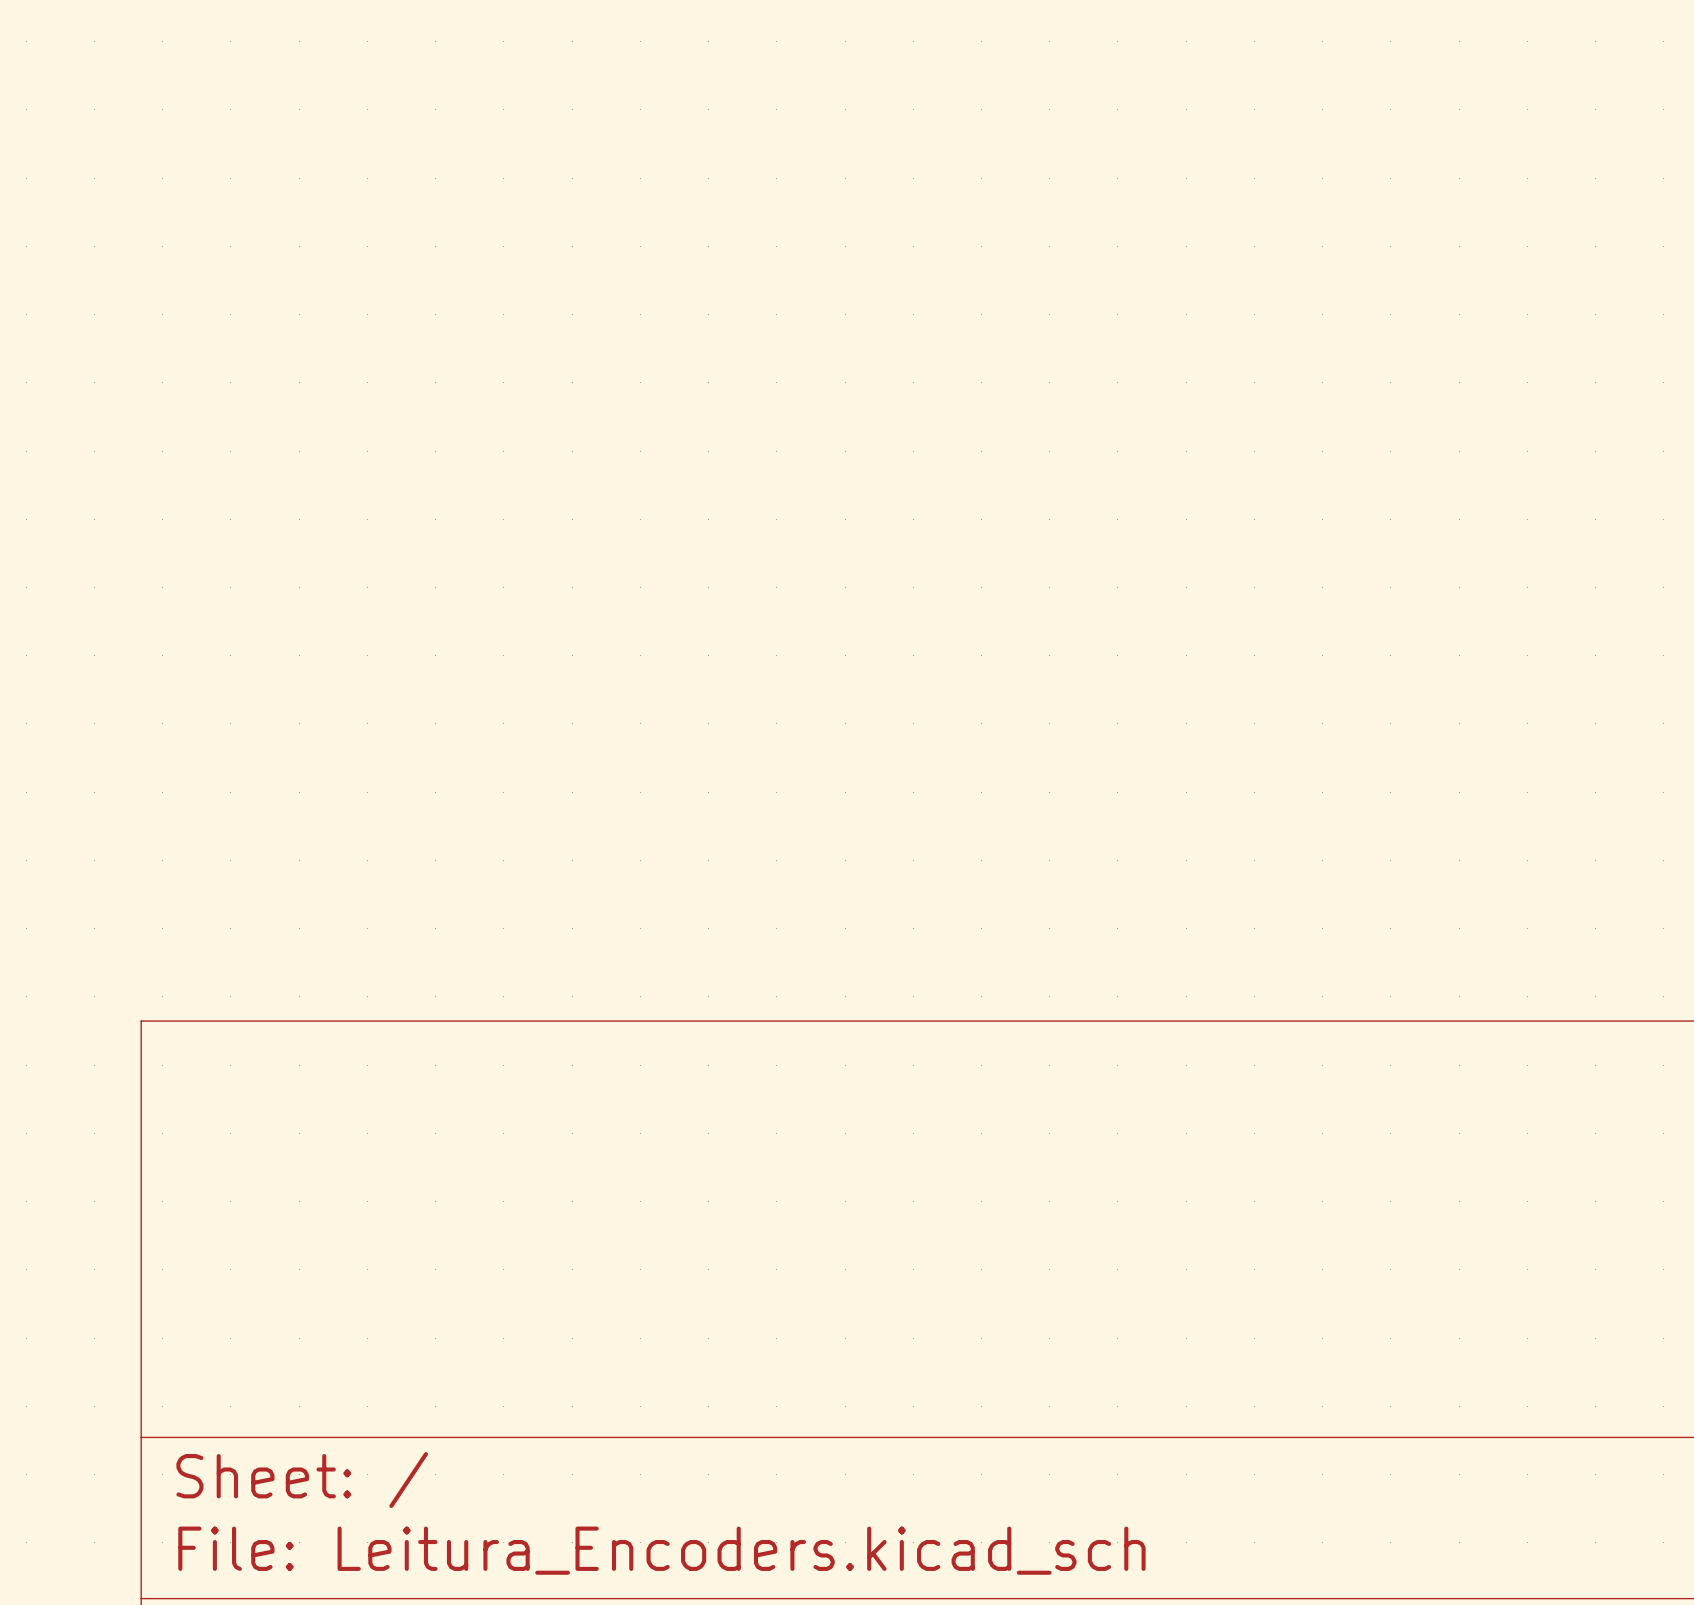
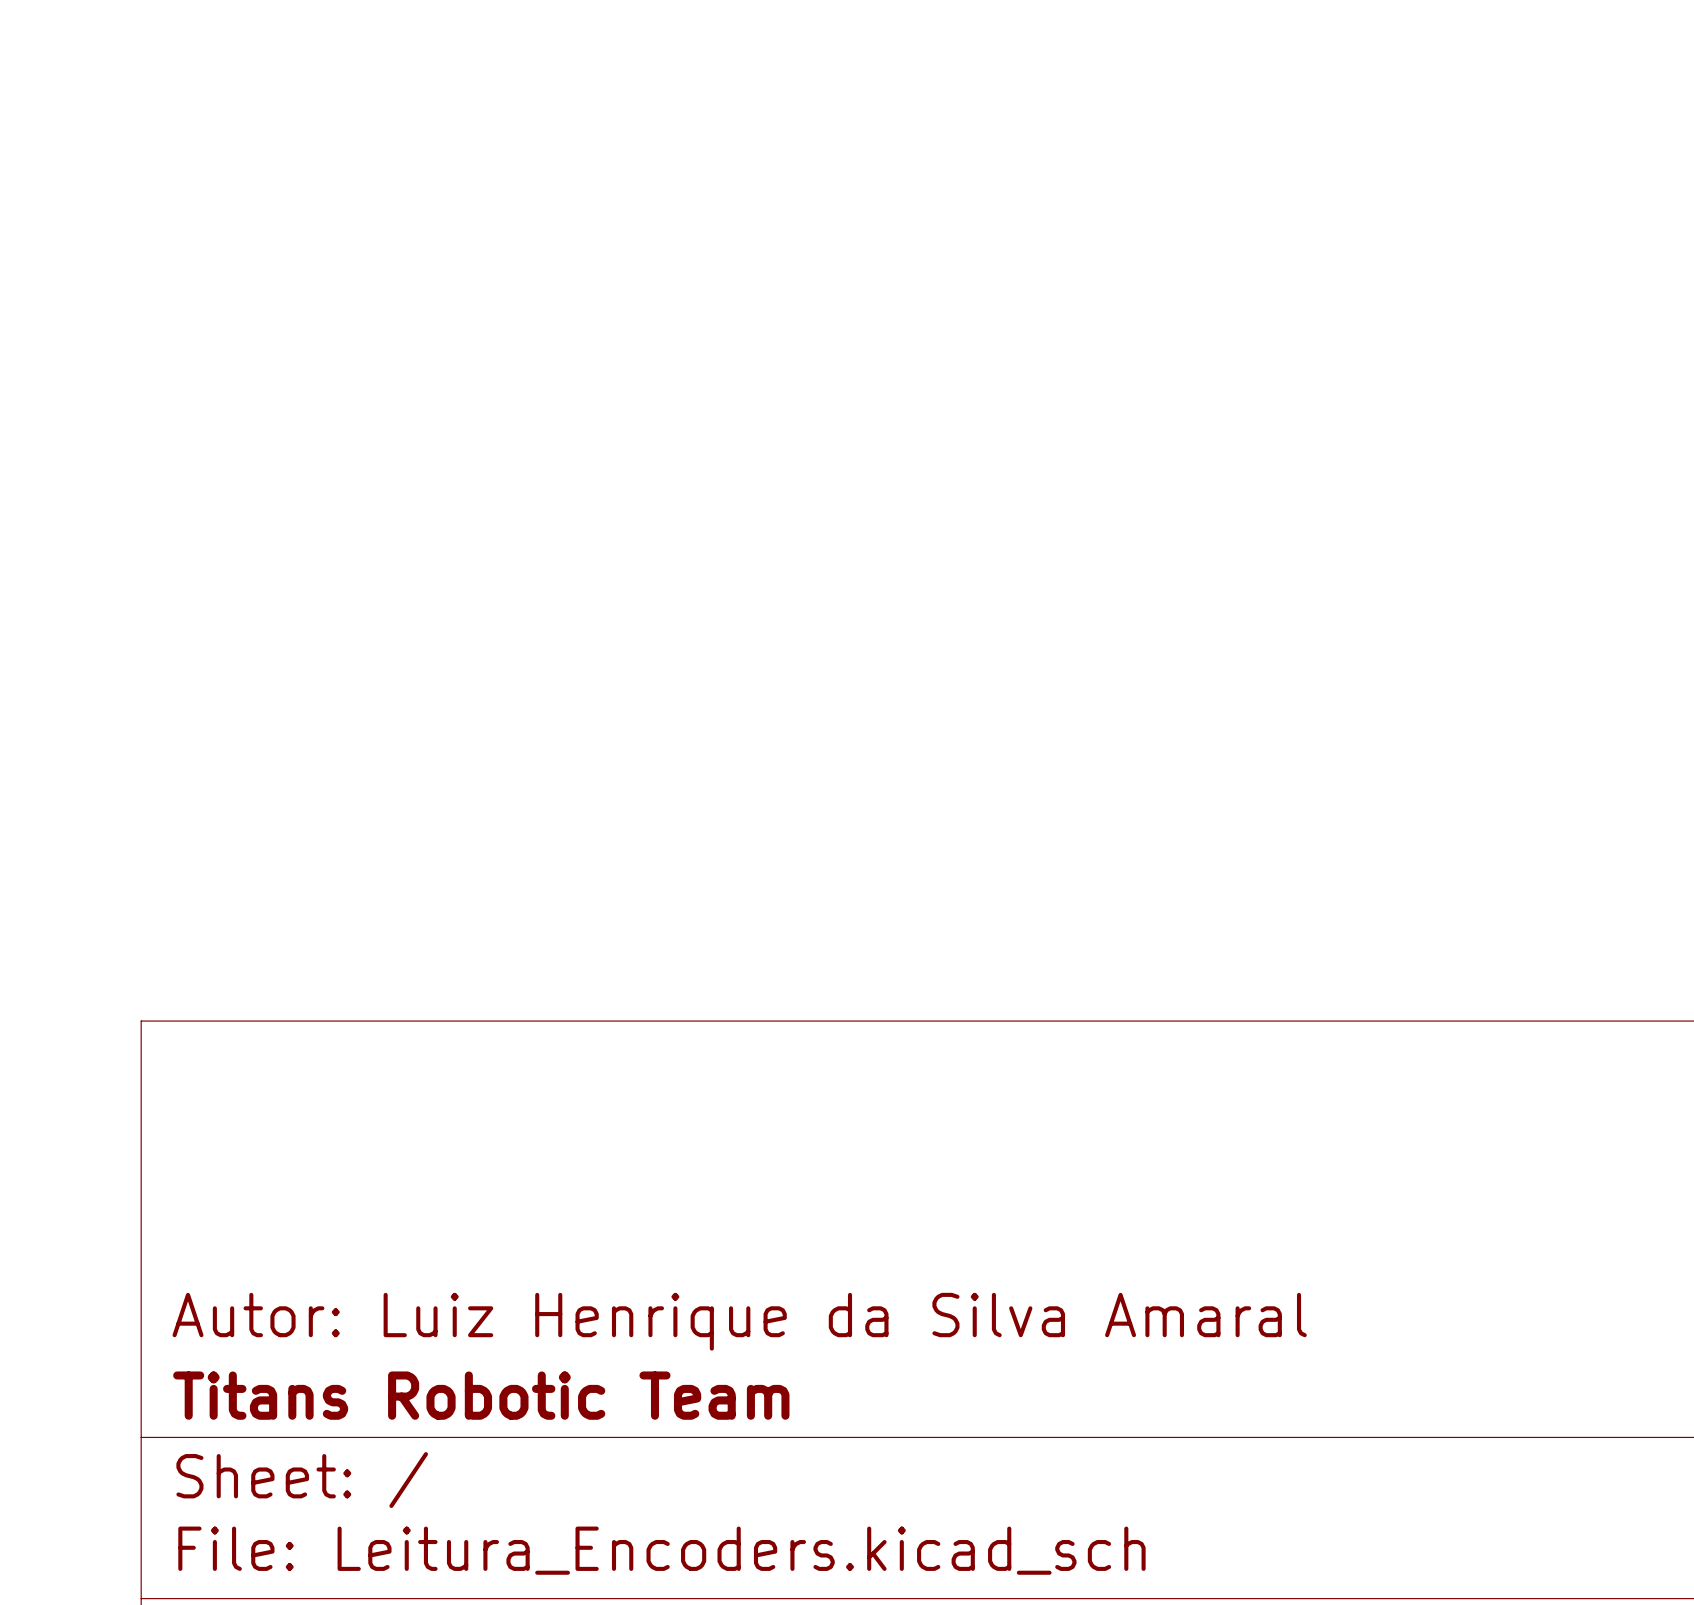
title block: none -> Autor: Luiz Henrique da Silva Amaral (739, 1321)
title block: none -> Titans Robotic Team (481, 1395)

